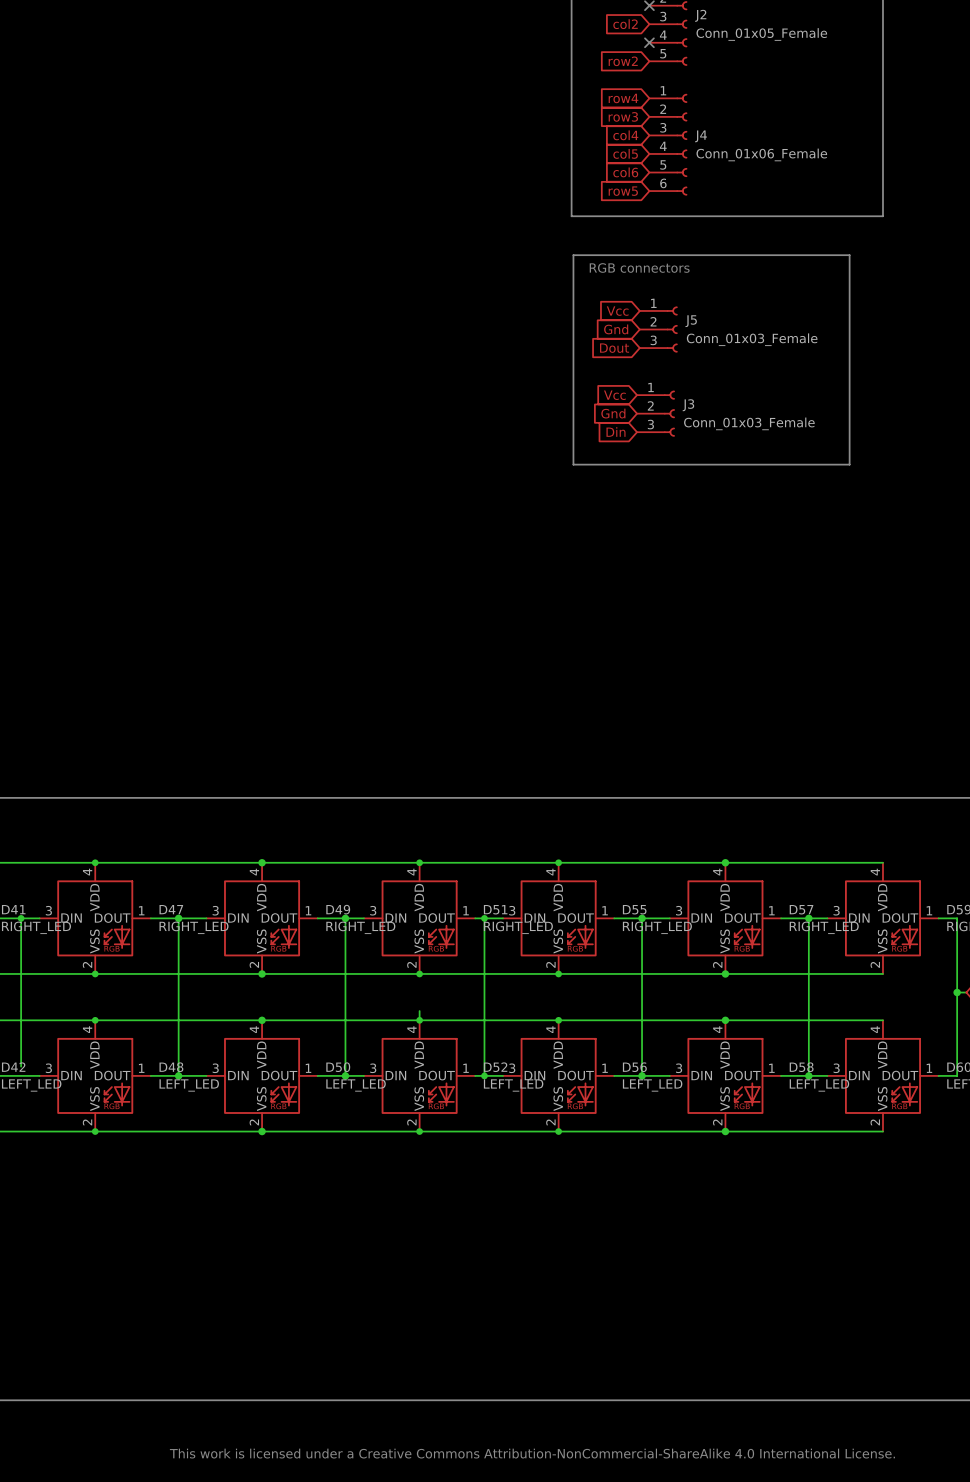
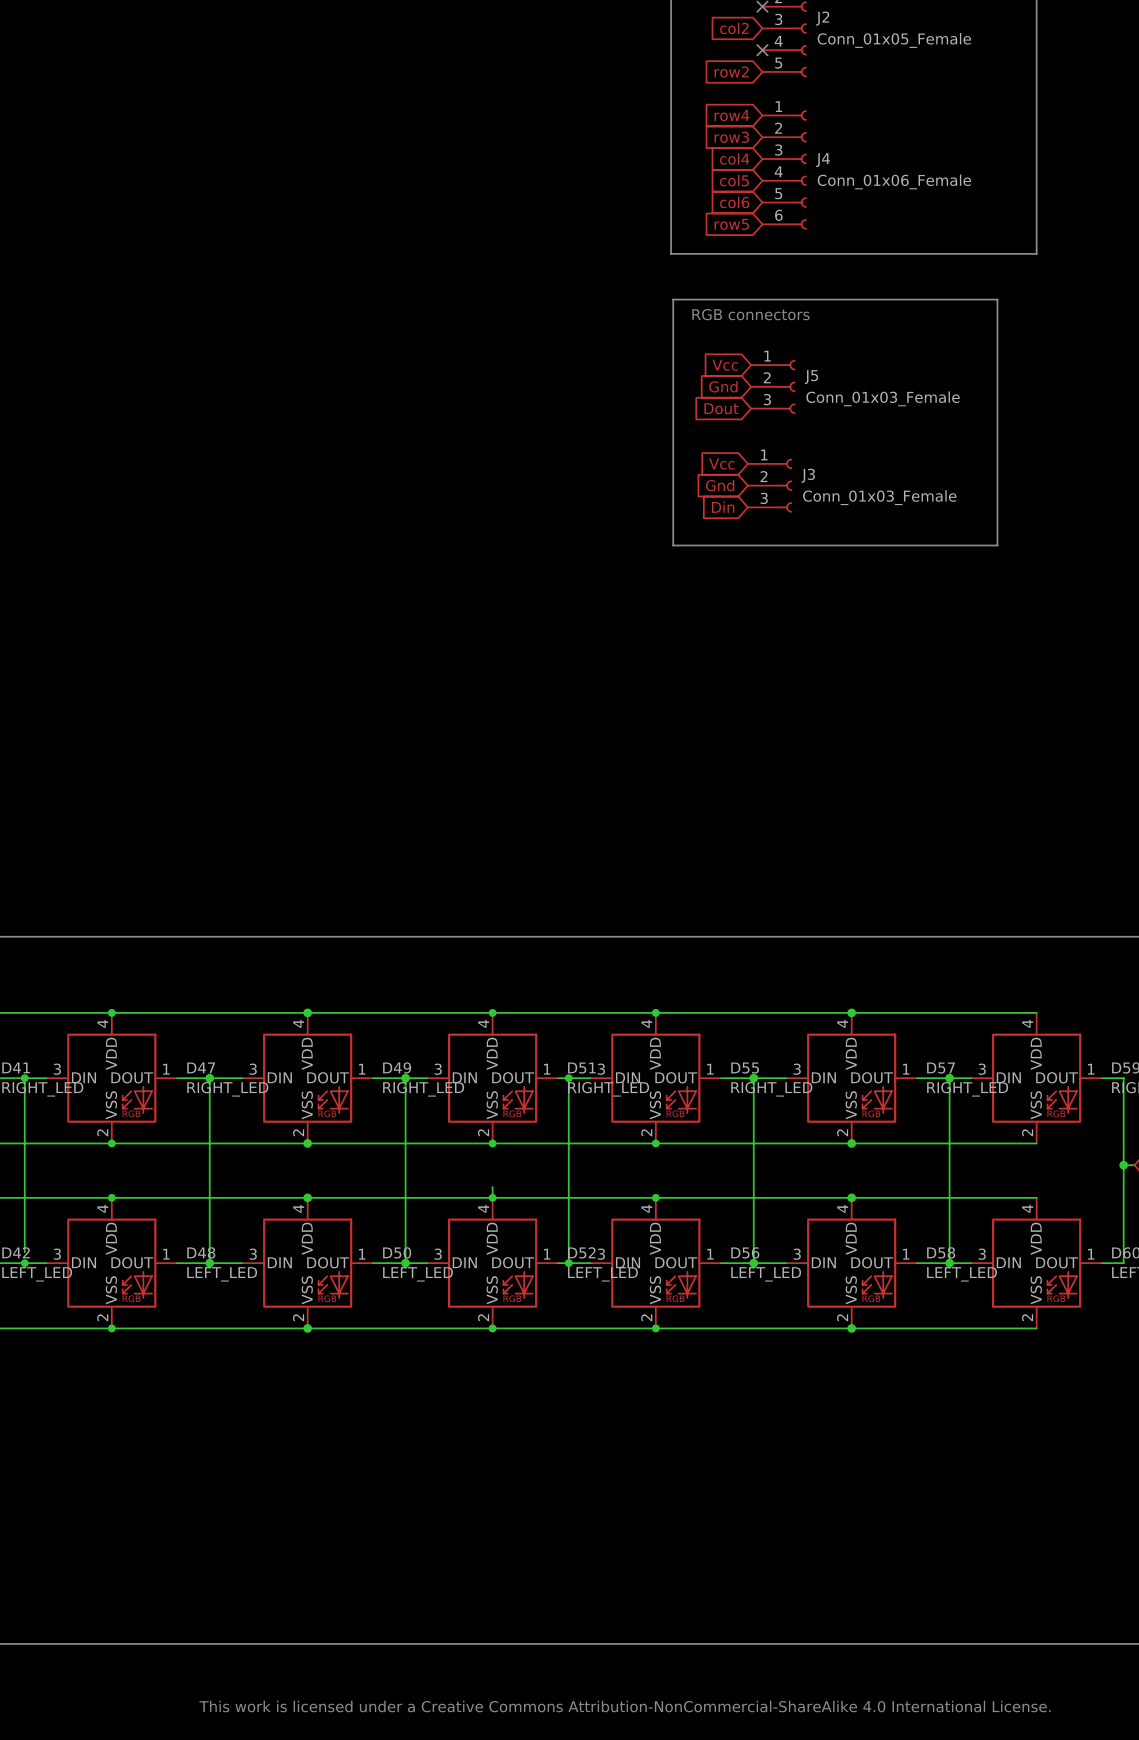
junction: none -> (24, 1263)

